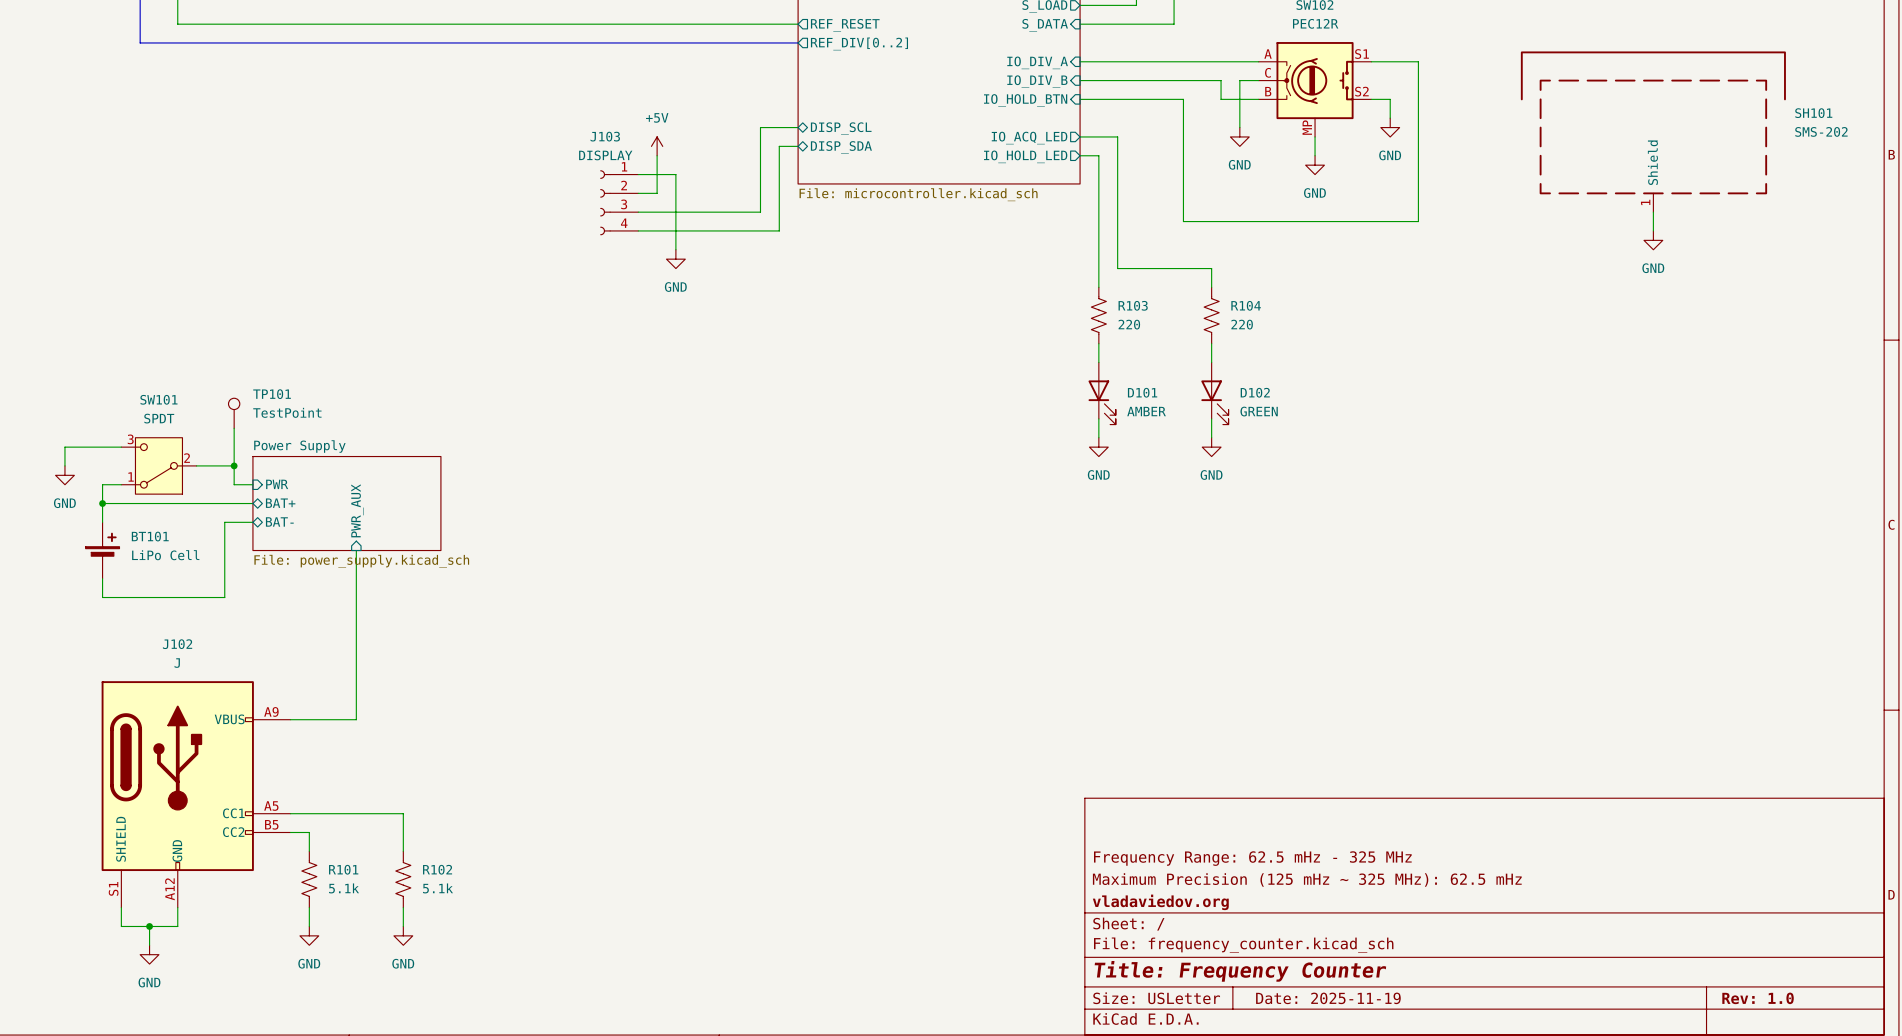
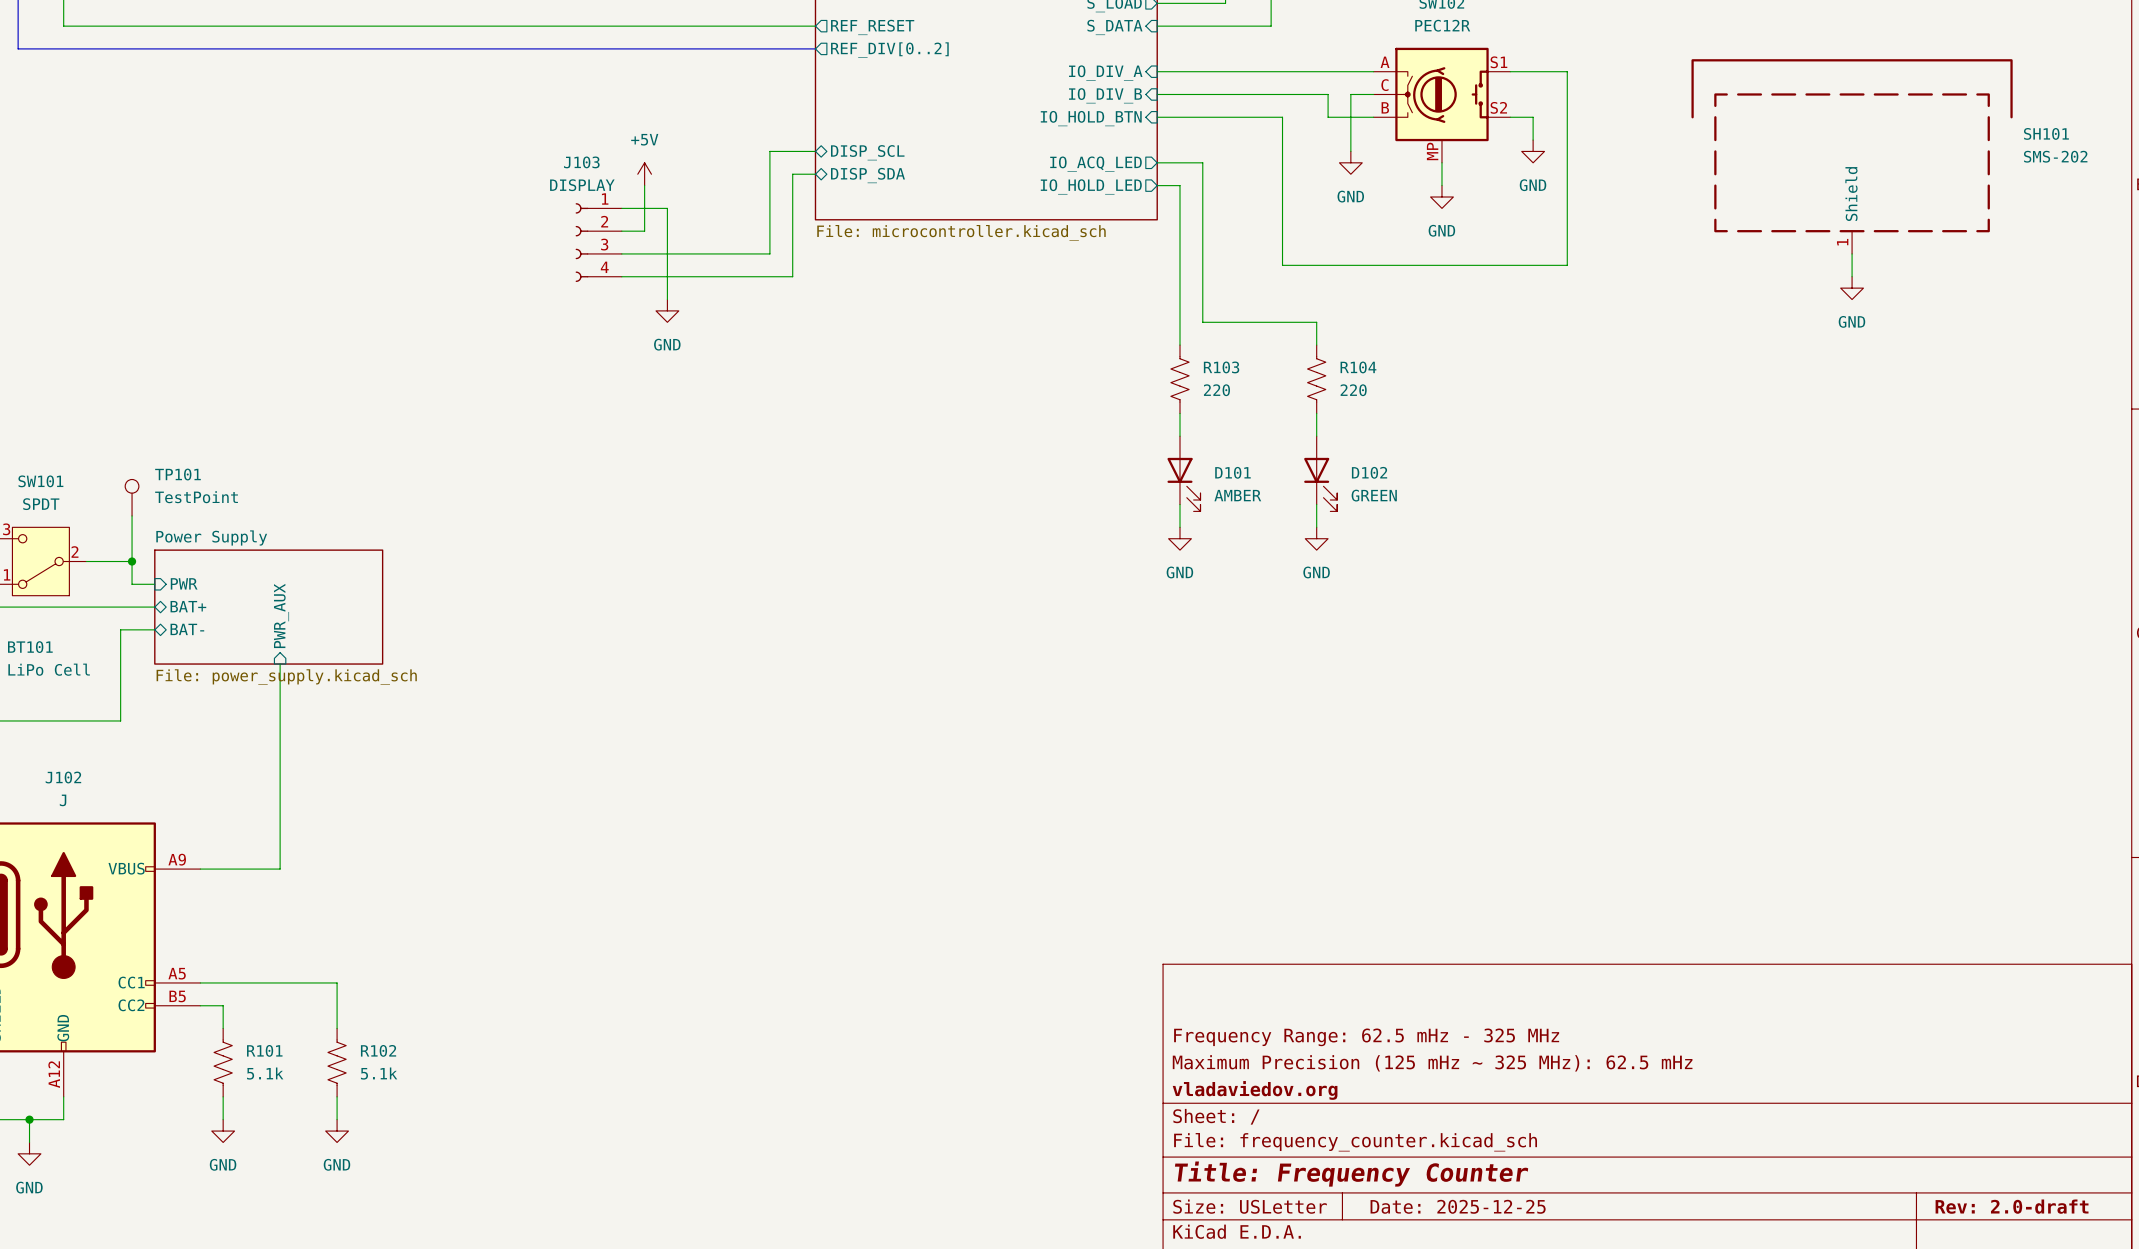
title block: Date: 2025-11-19 (1328, 998) -> Date: 2025-12-25 (1458, 1206)
title block: Rev: 1.0 (1758, 998) -> Rev: 2.0-draft (2012, 1206)

